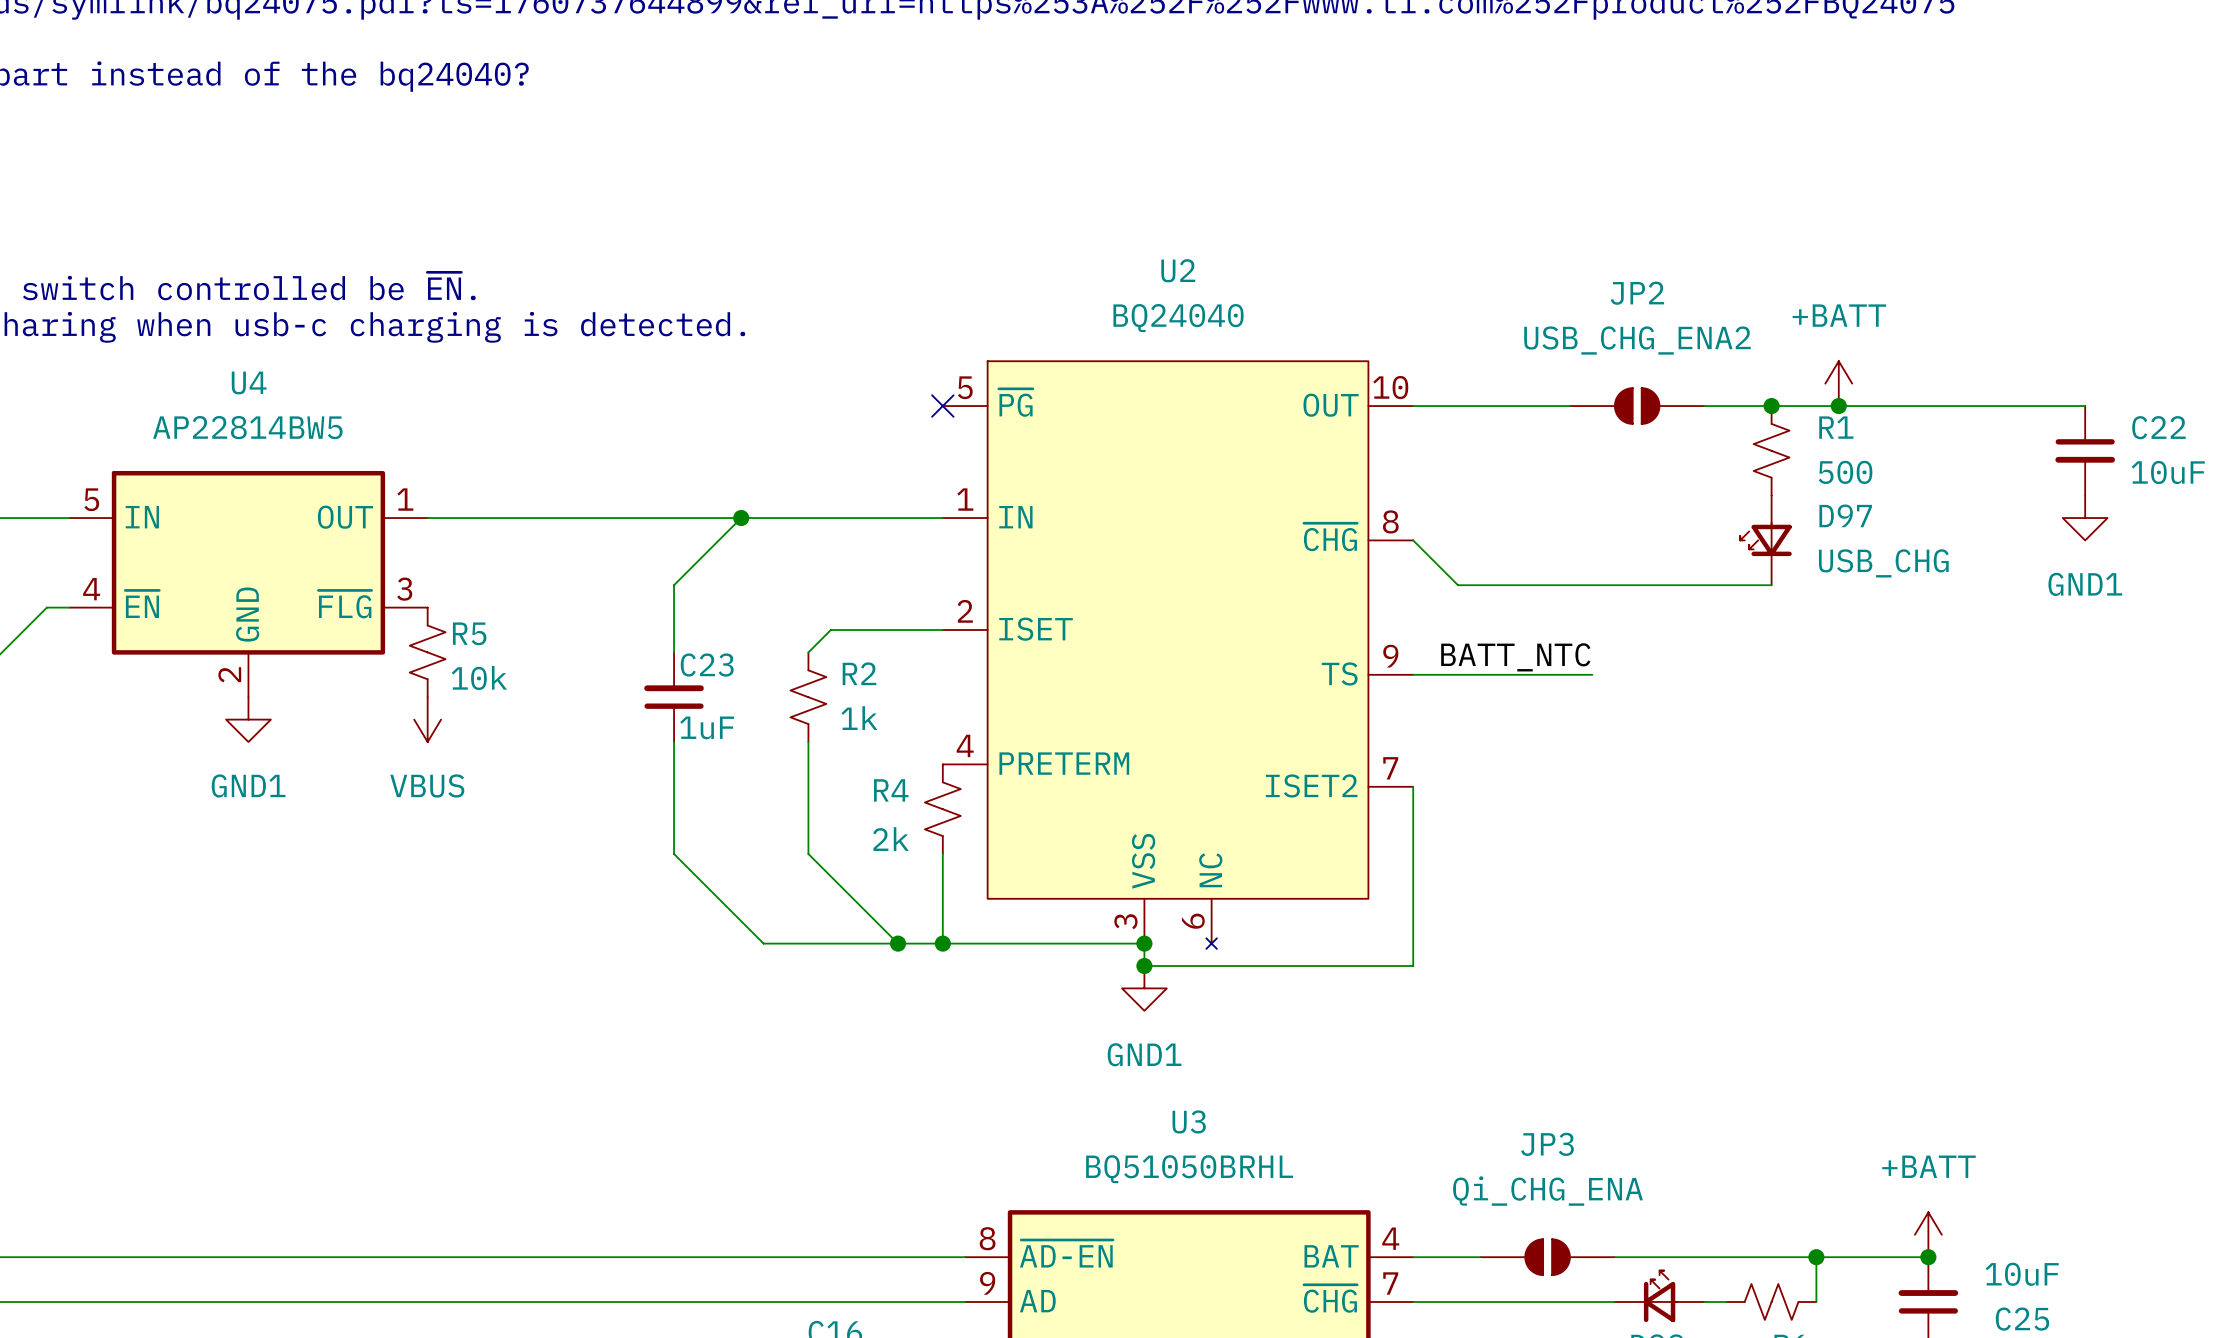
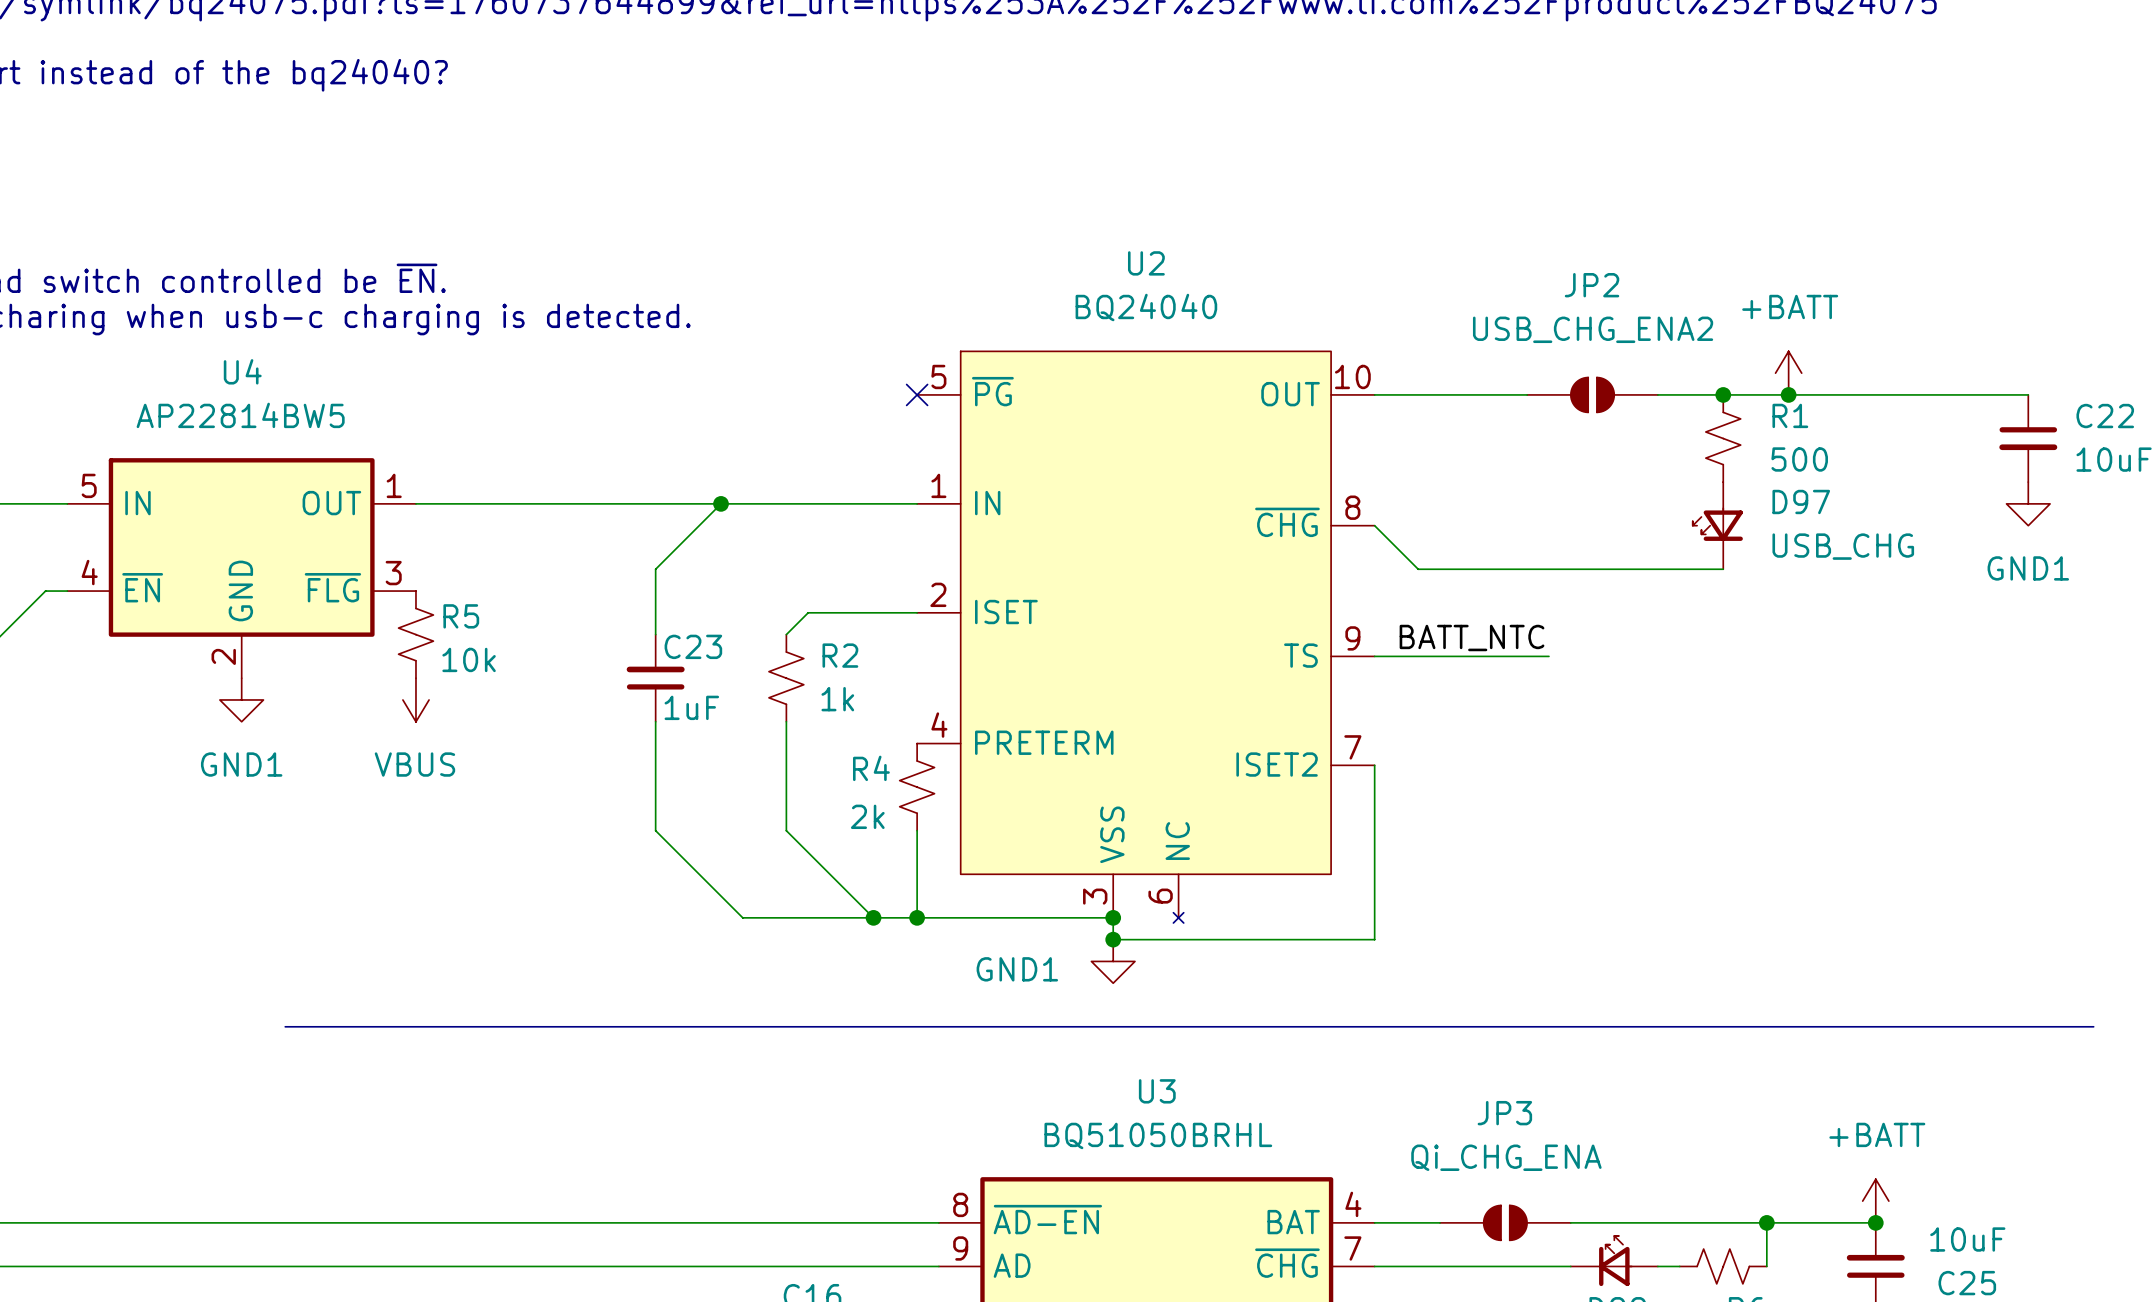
power symbol text position: GND1 (1144, 1054) -> GND1 (1017, 969)
line: none -> (285, 1026) (2093, 1026)

